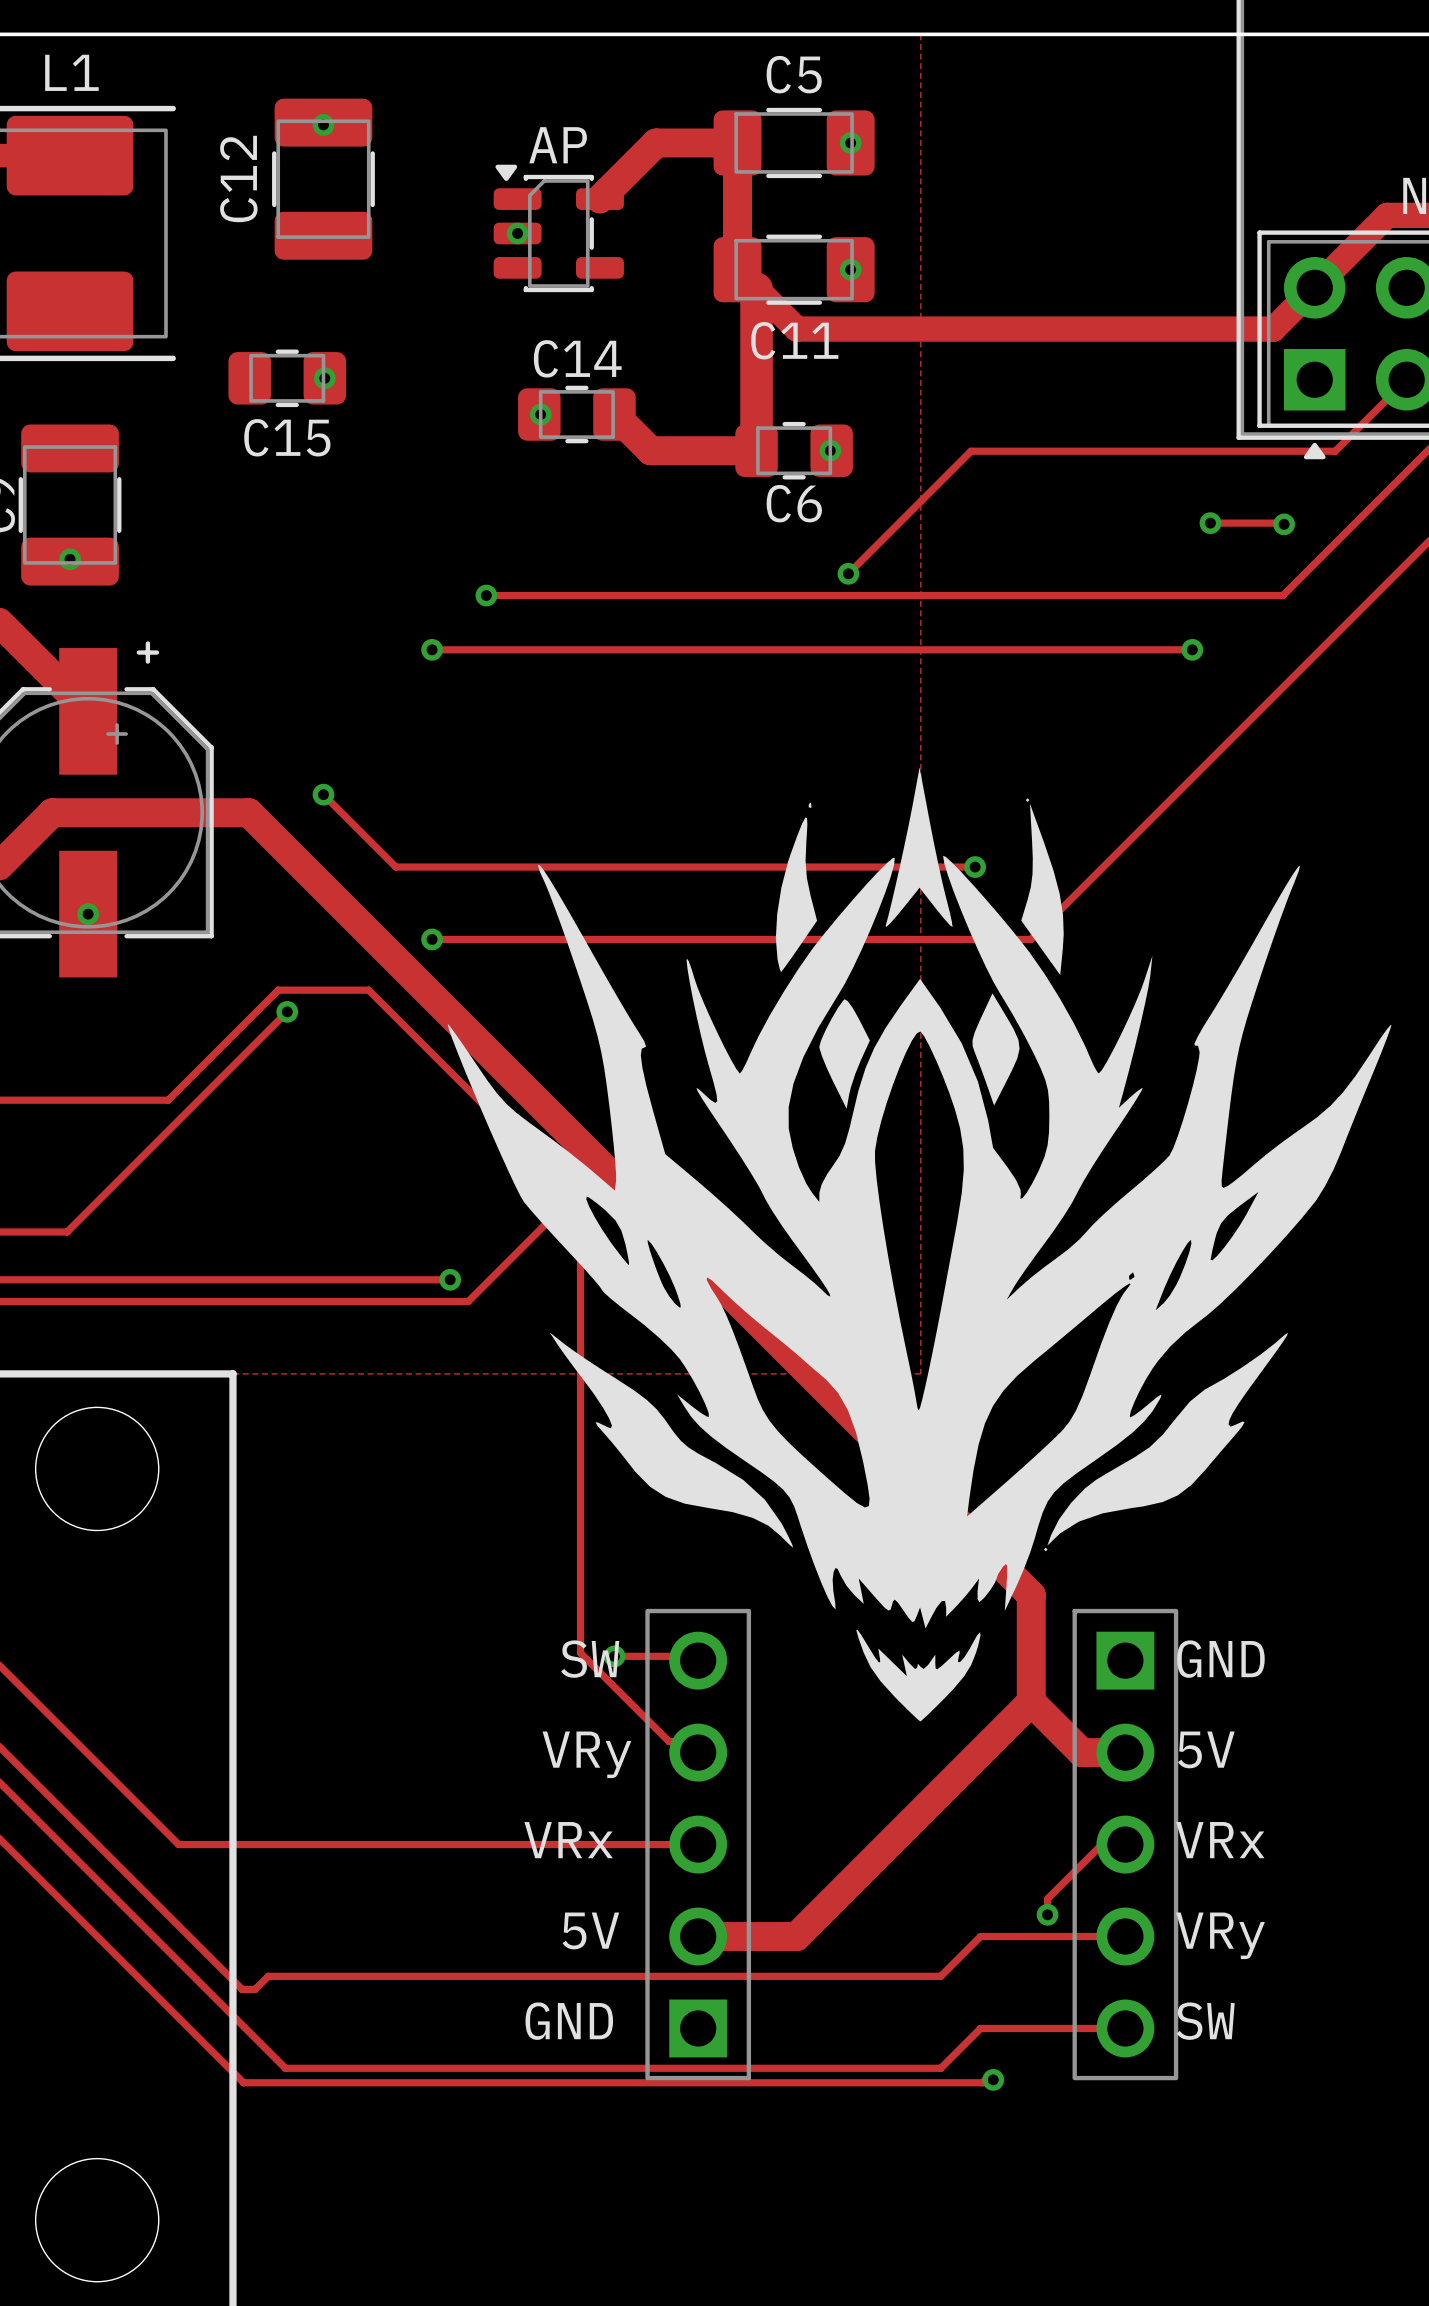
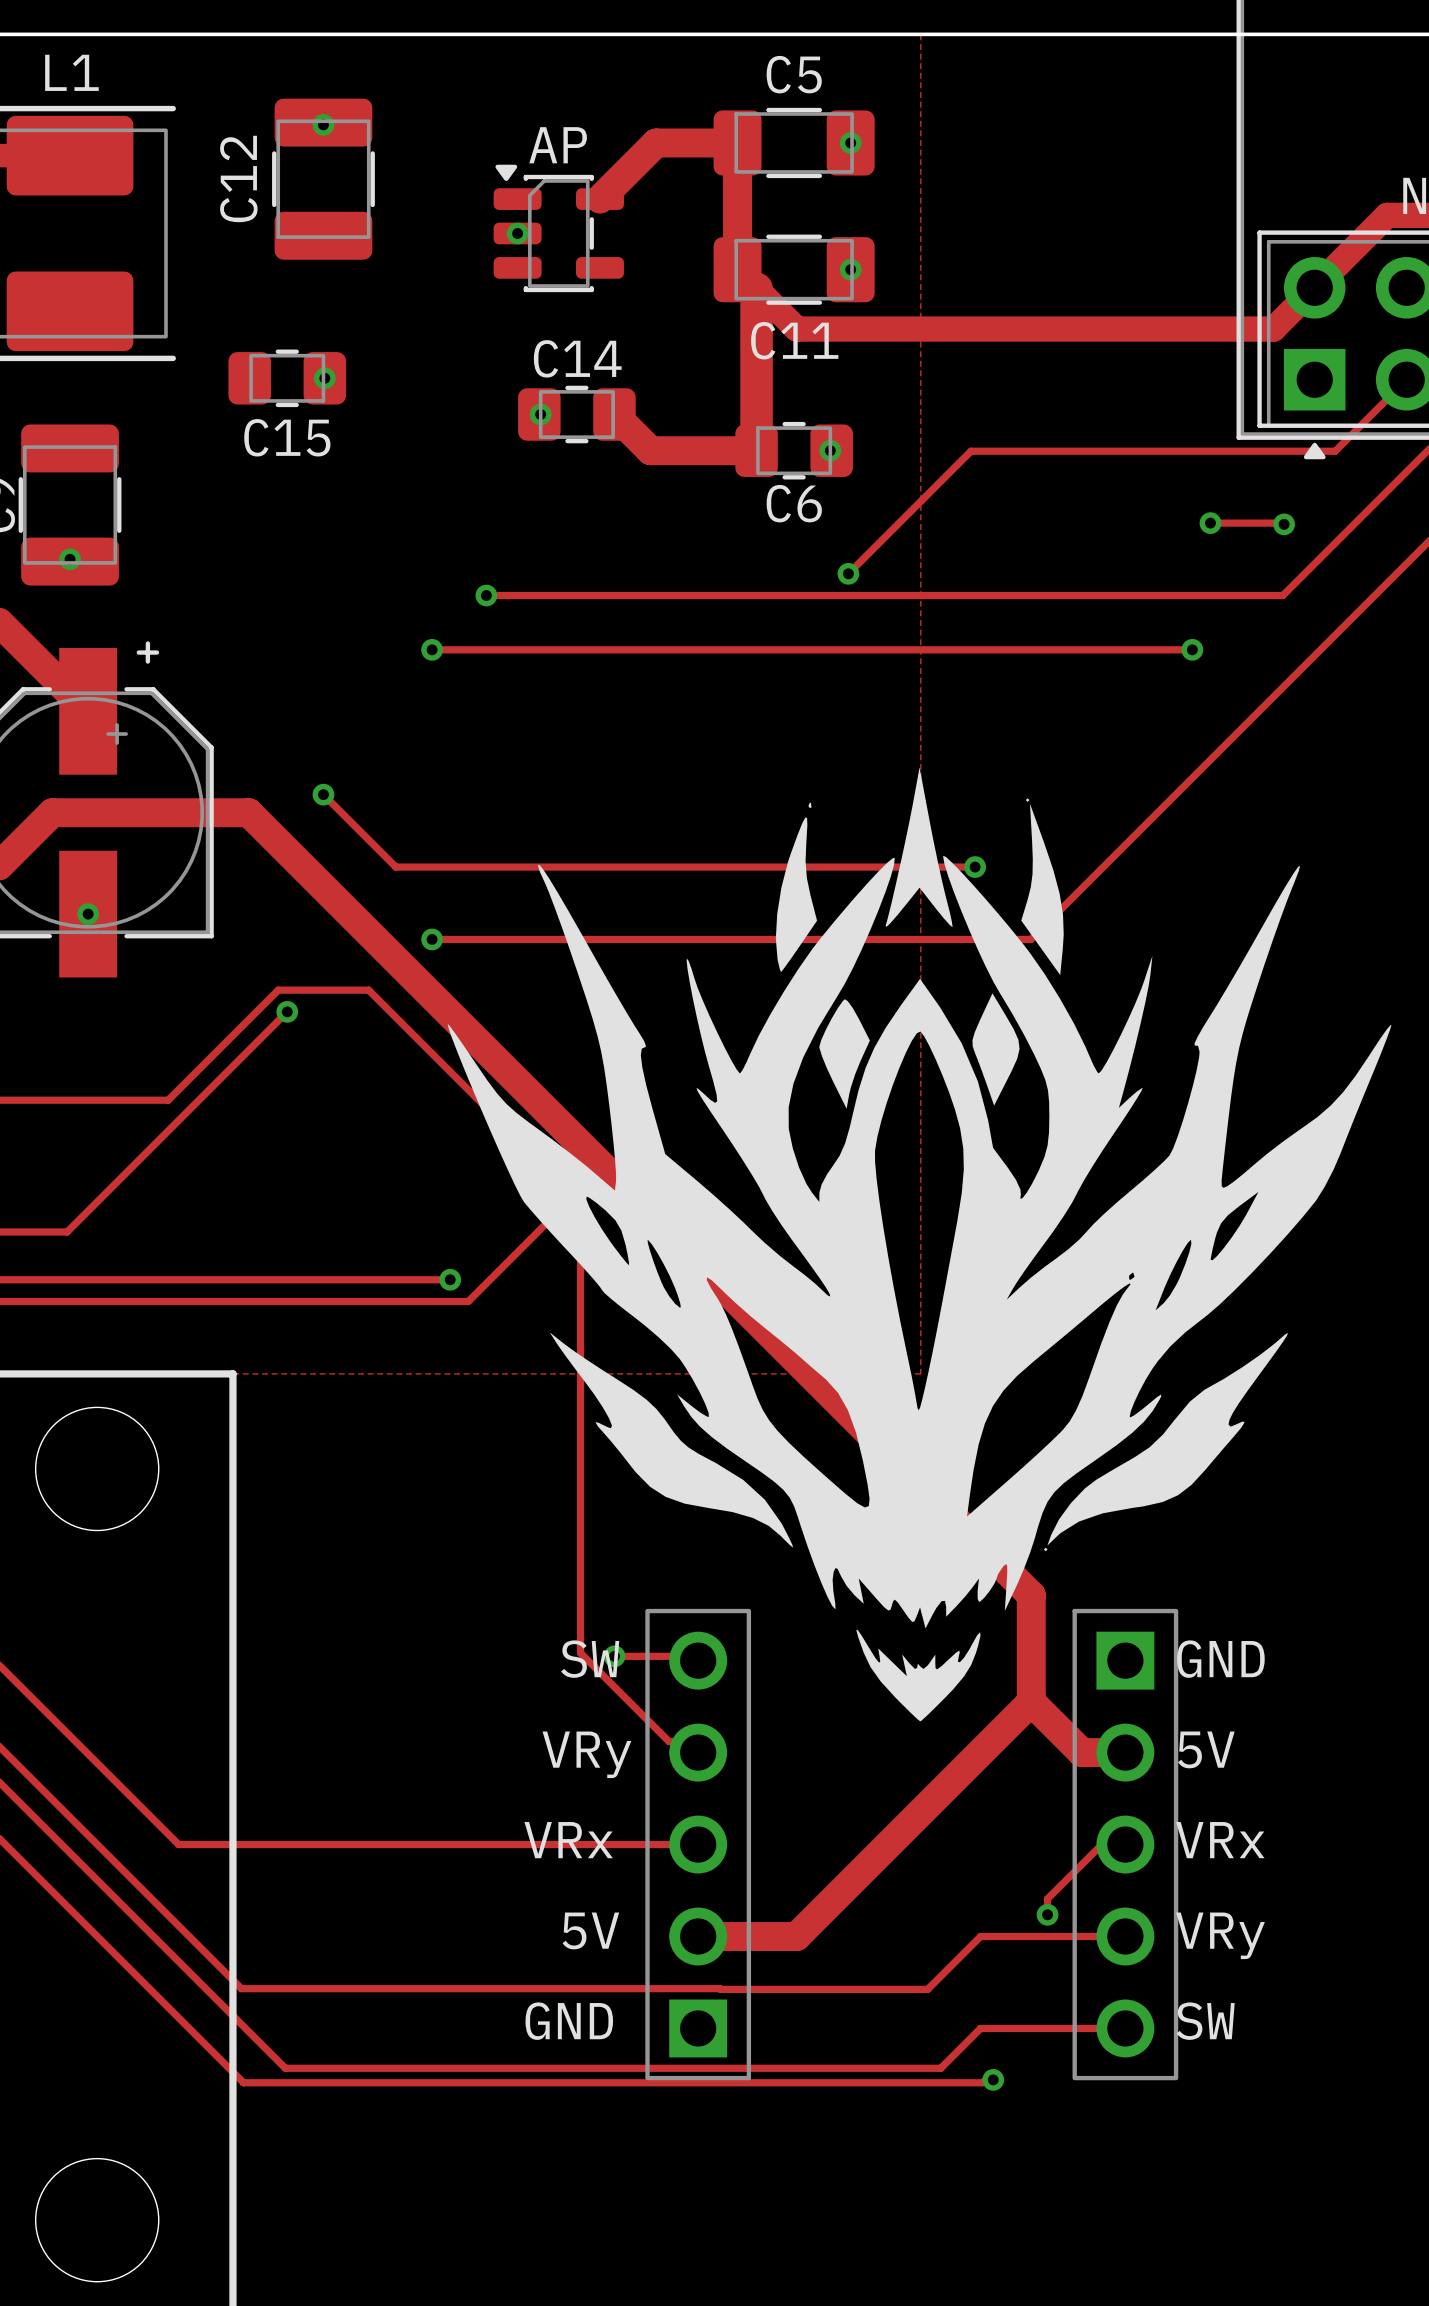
track: (940, 1976) (268, 1976) (255, 1989) (241, 1988) -> (940, 1976) (927, 1989) (241, 1988)

